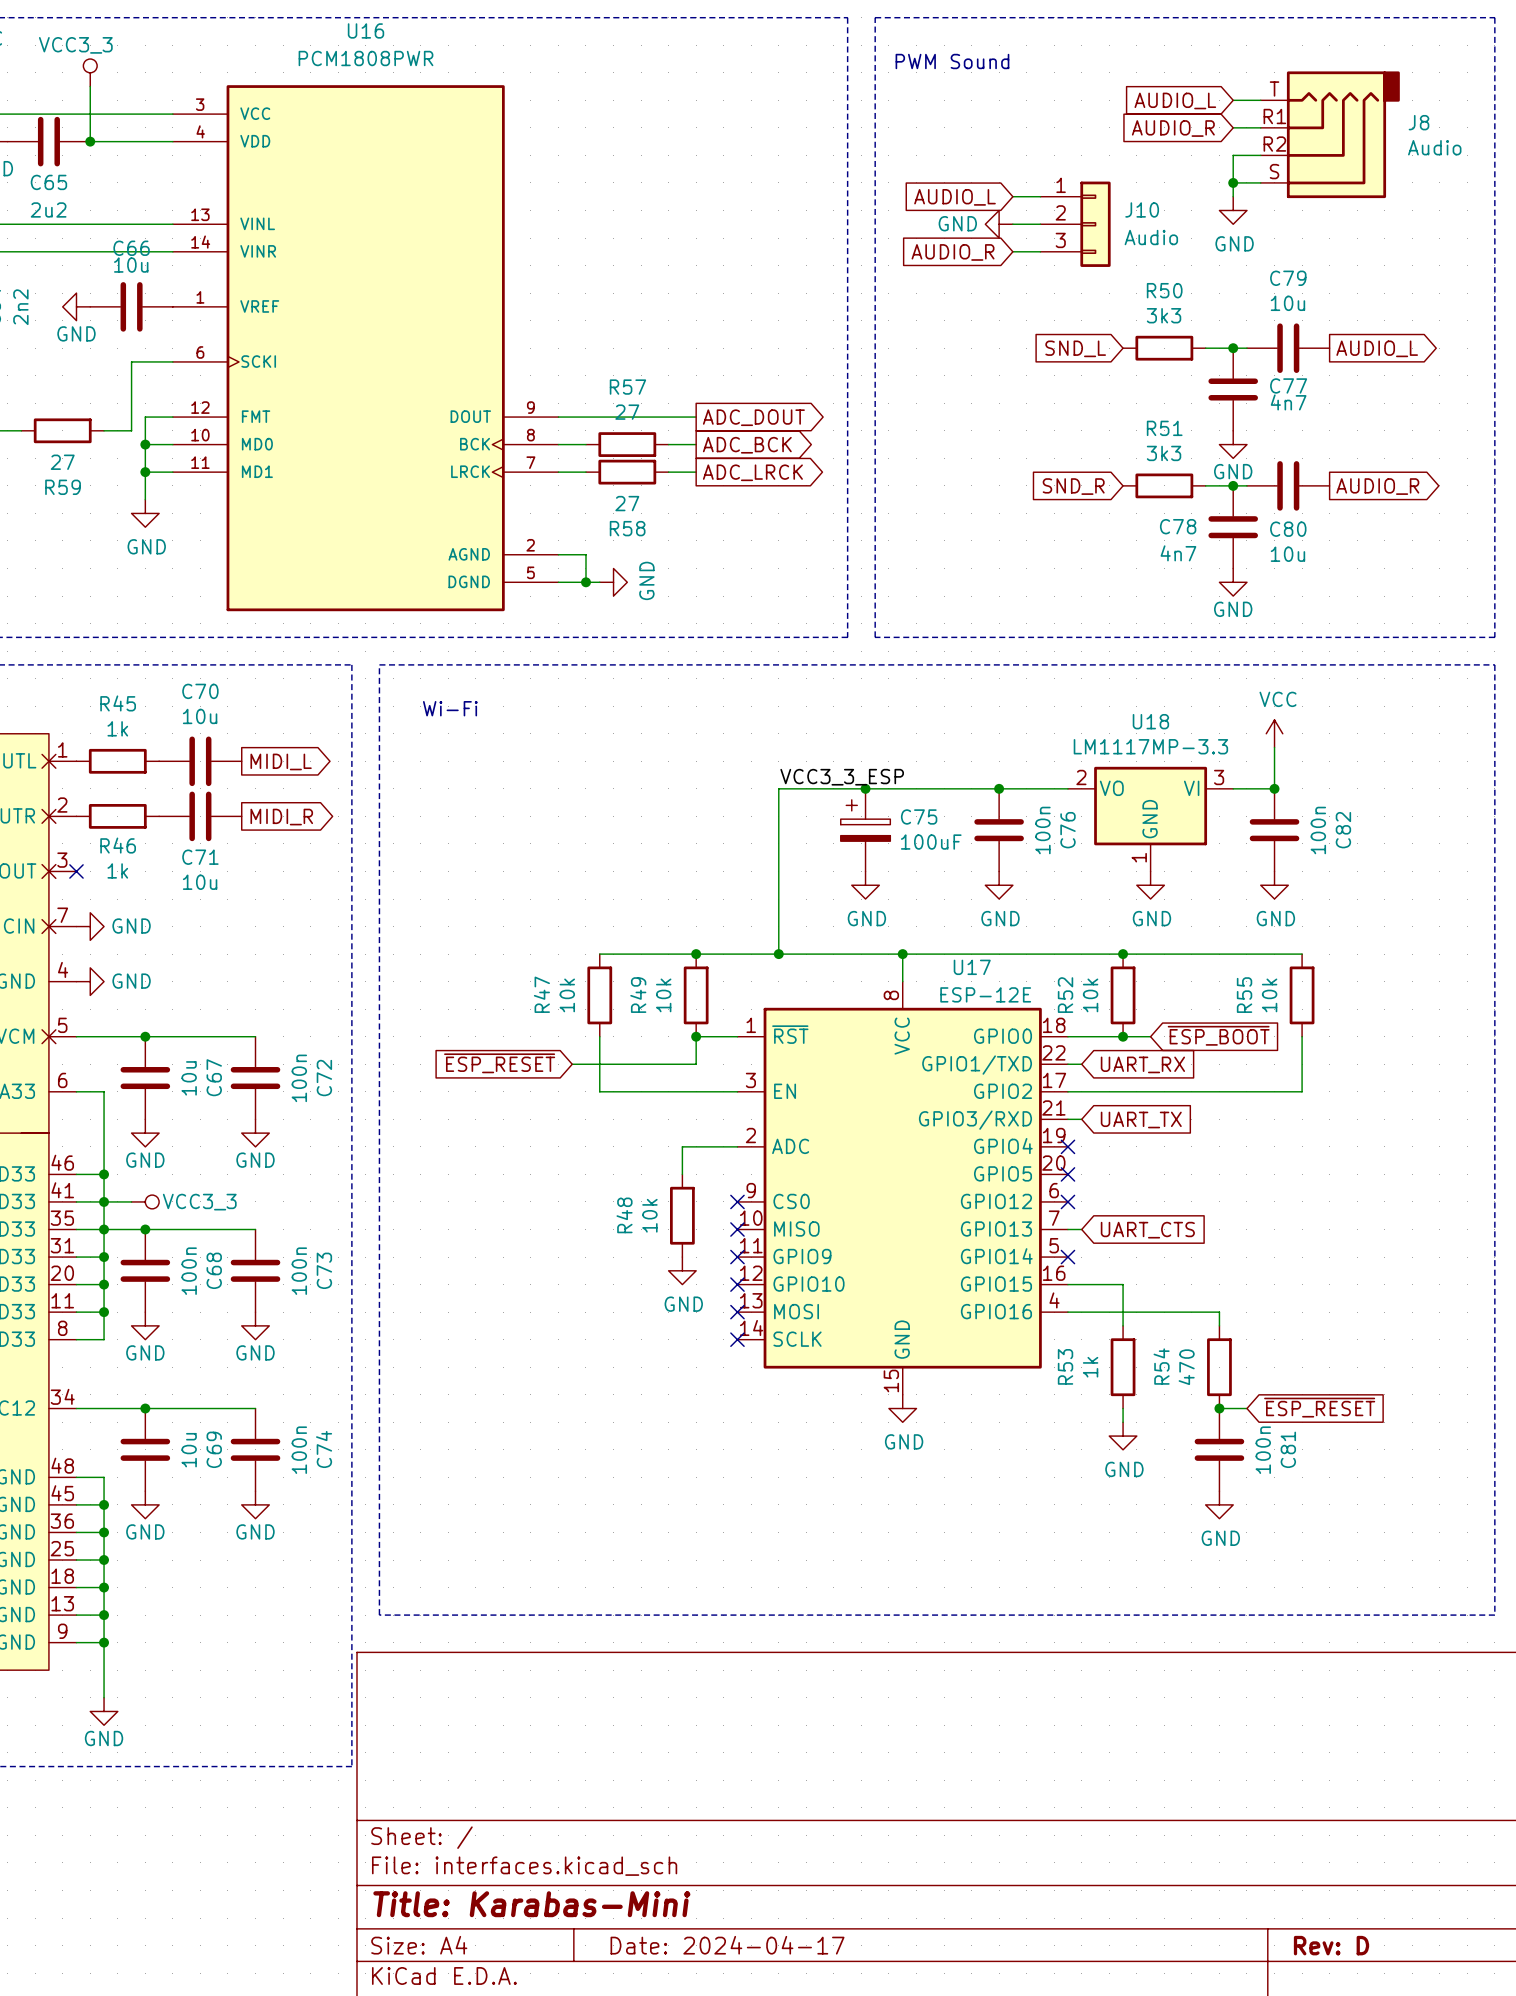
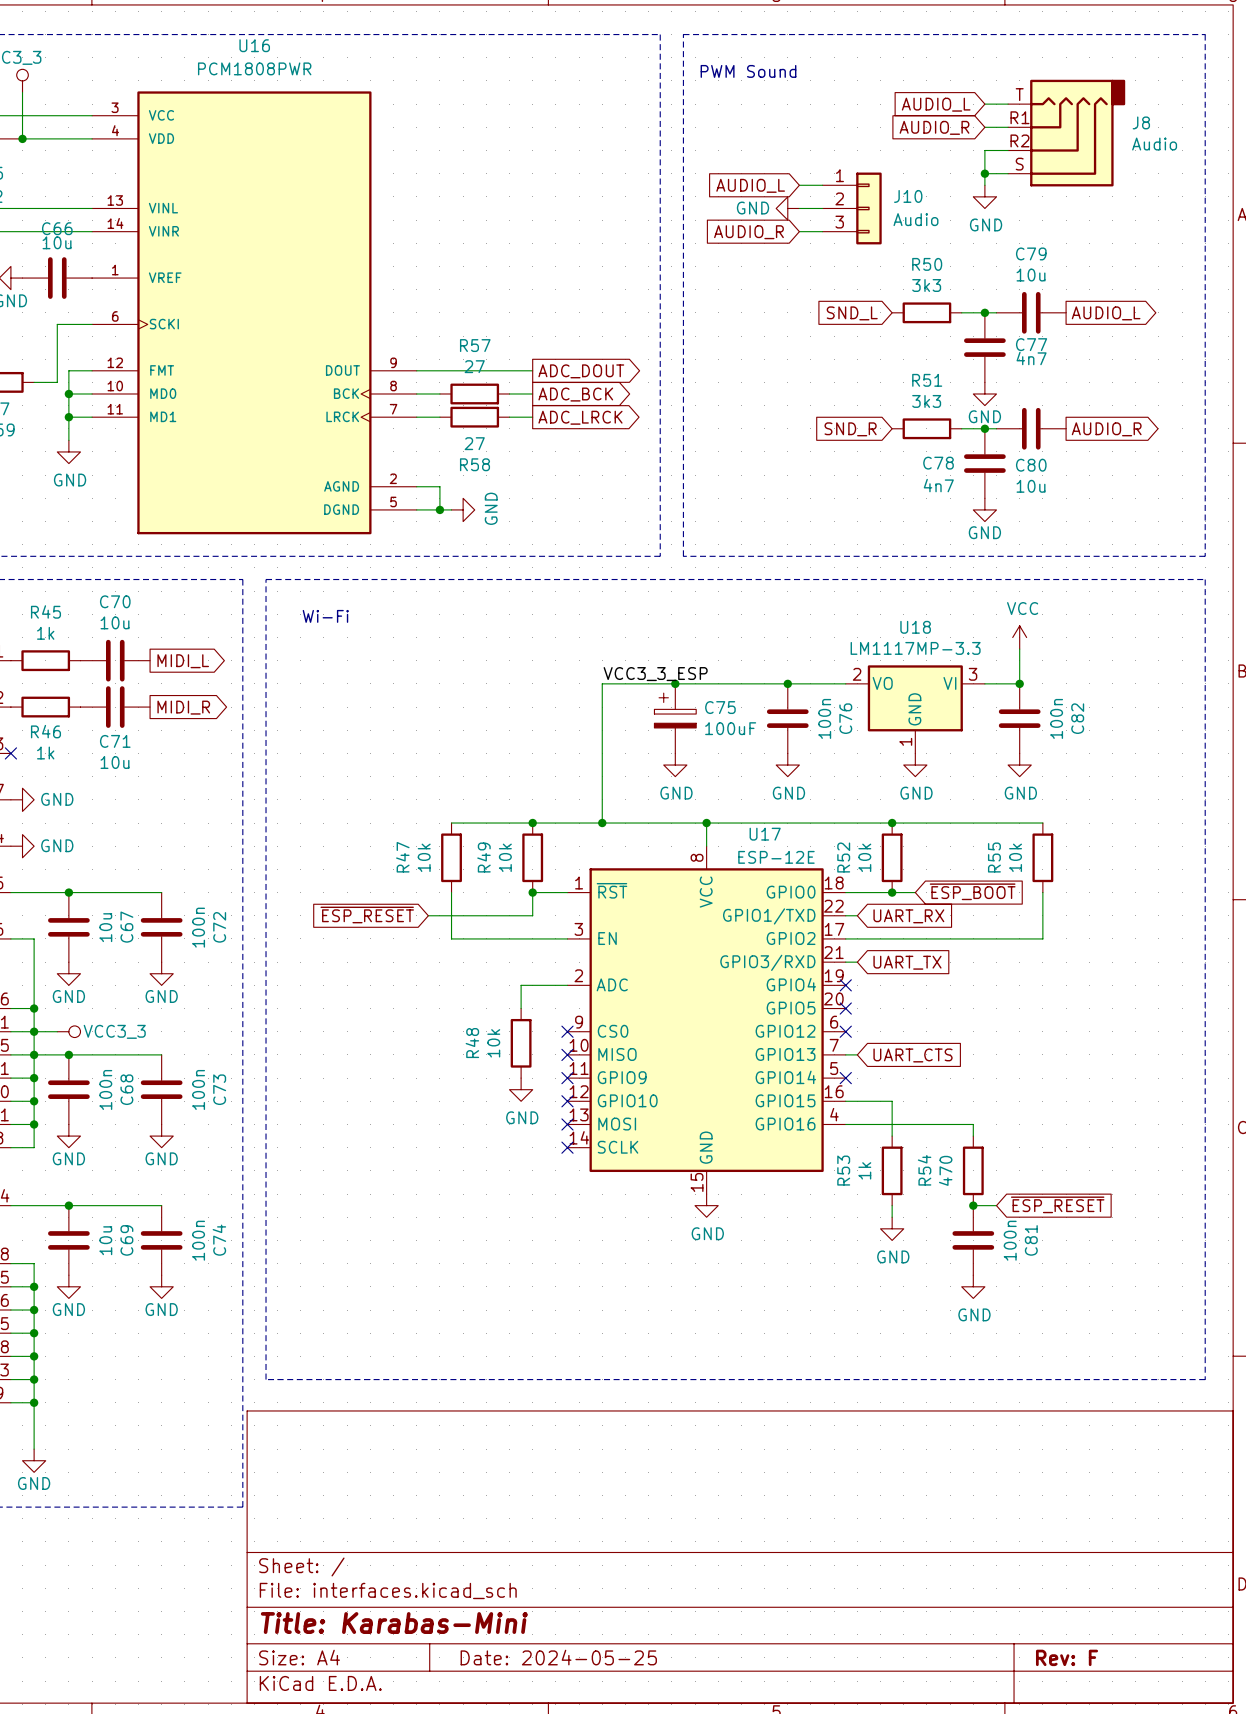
title block: Date: 2024-04-17 (727, 1945) -> Date: 2024-05-25 (558, 1657)
title block: Rev: D (1331, 1945) -> Rev: F (1067, 1657)

